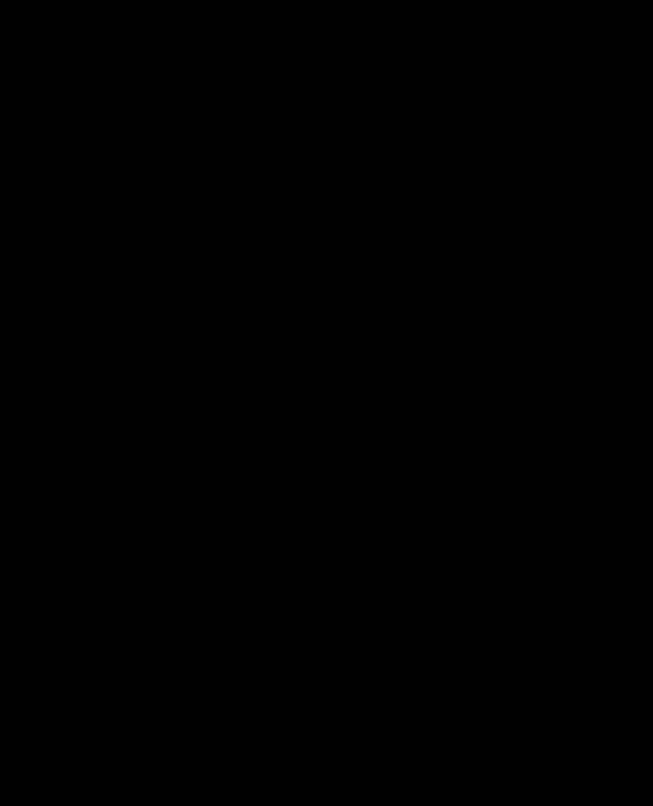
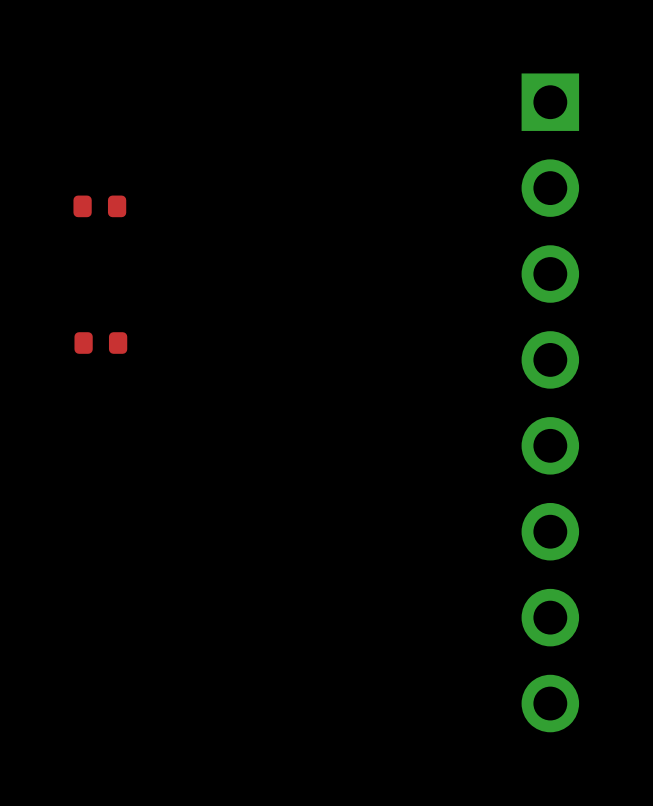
part: none -> (99, 206)
part: none -> (100, 343)
part: none -> (550, 402)

